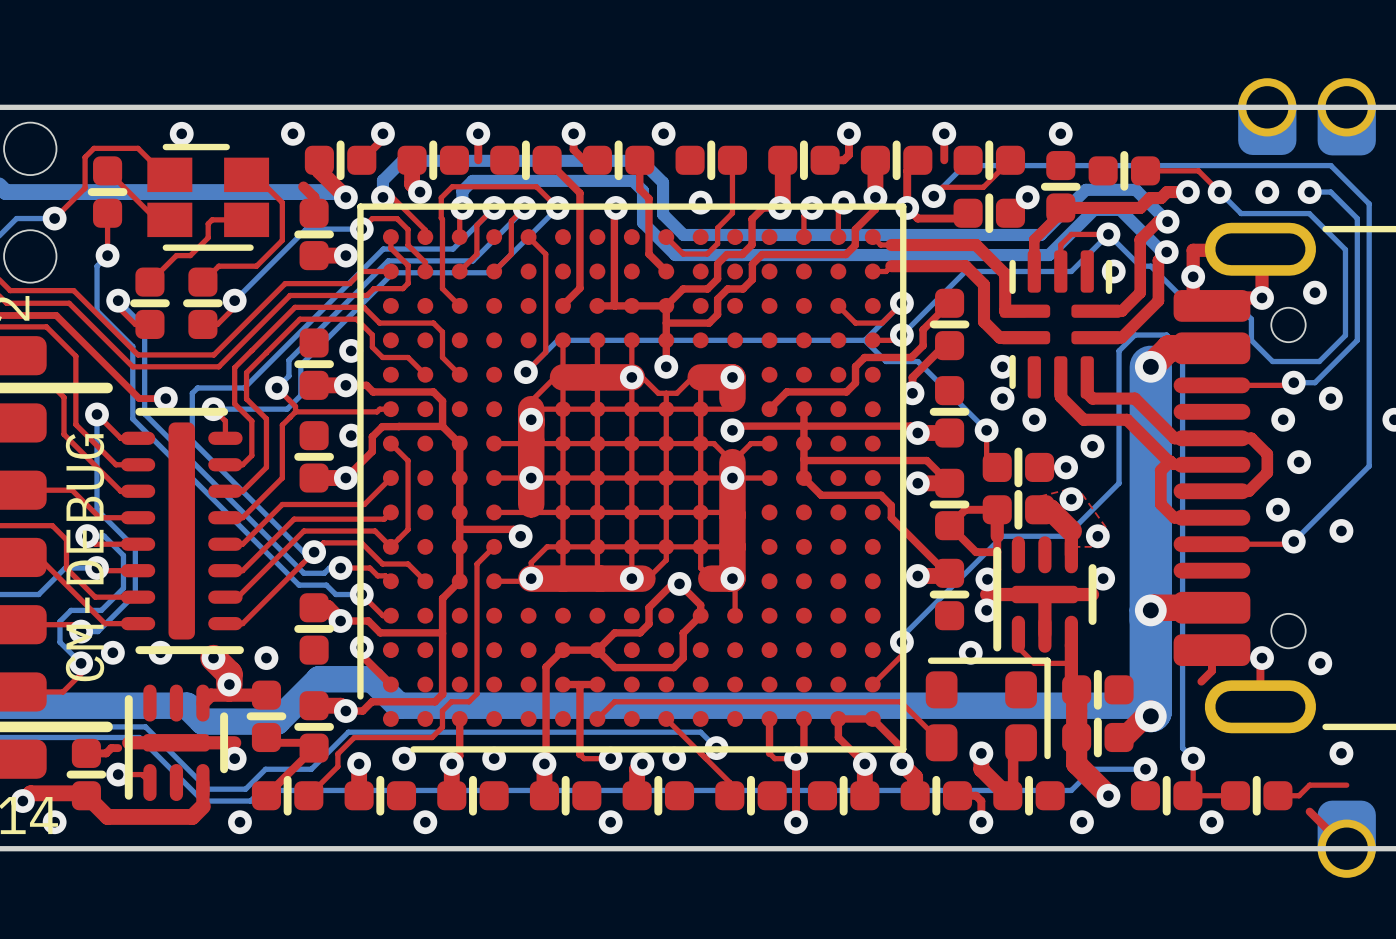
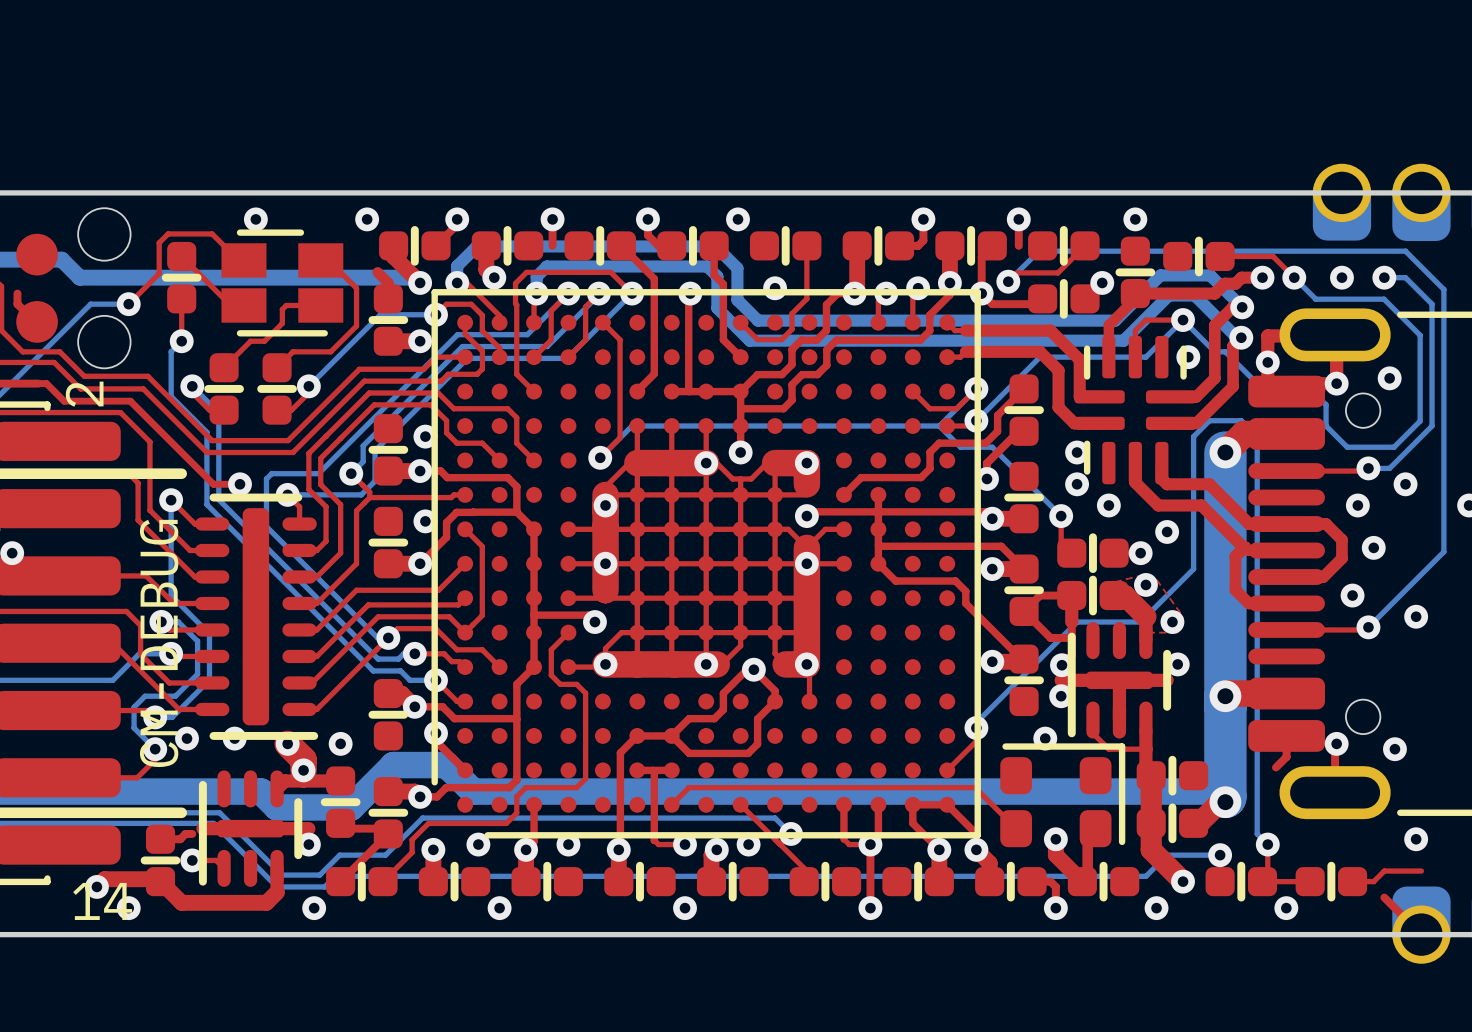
top track: (477, 589) (477, 693) (469, 701) -> (551, 675) (560, 684) (576, 684) (585, 693) (585, 778) (576, 787) (543, 787)

